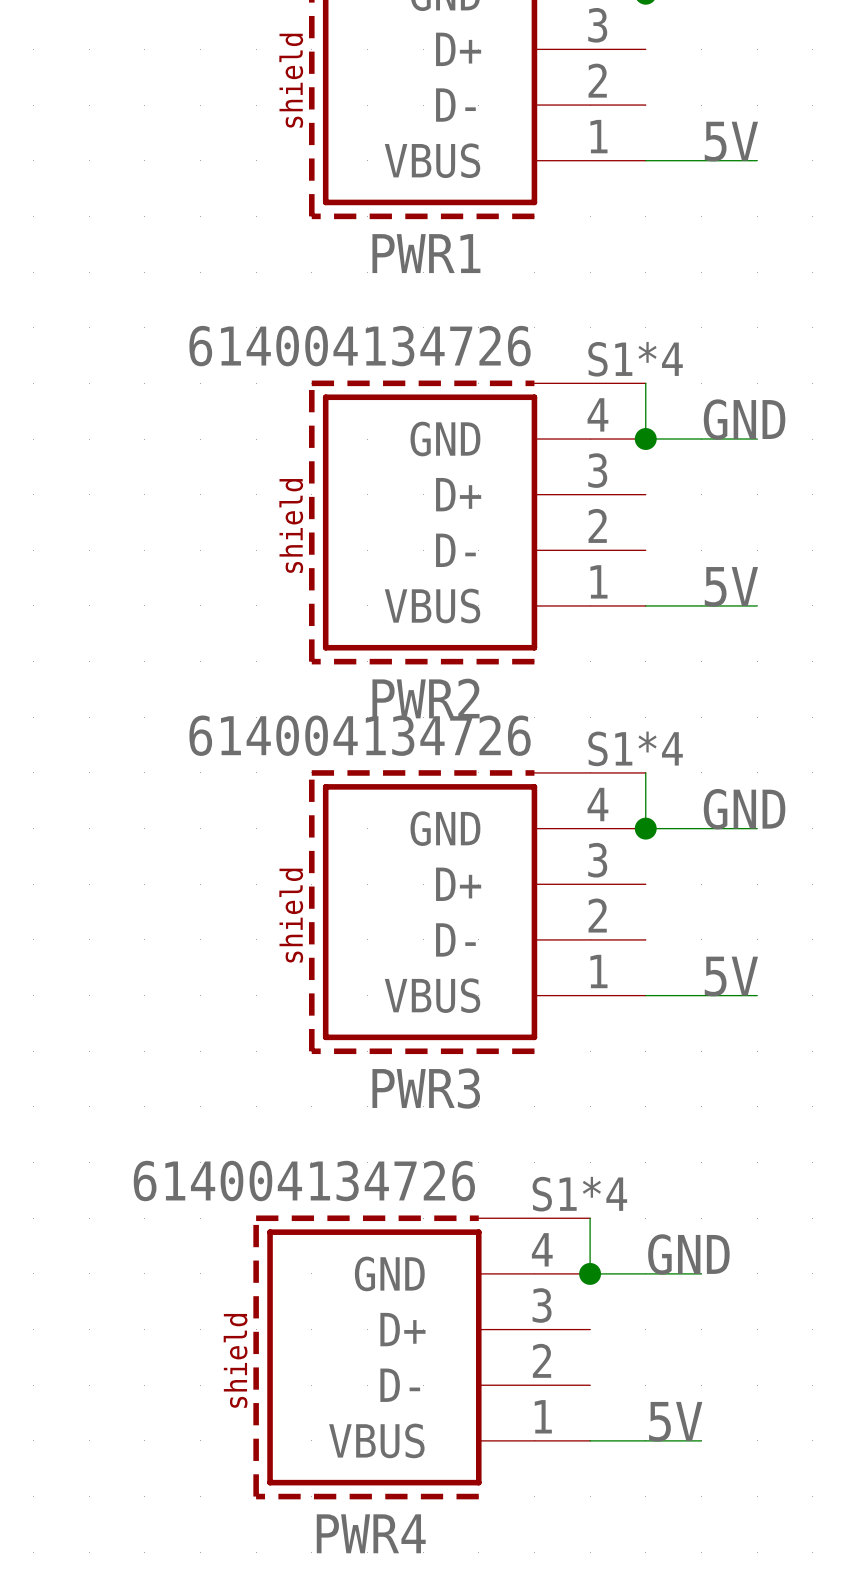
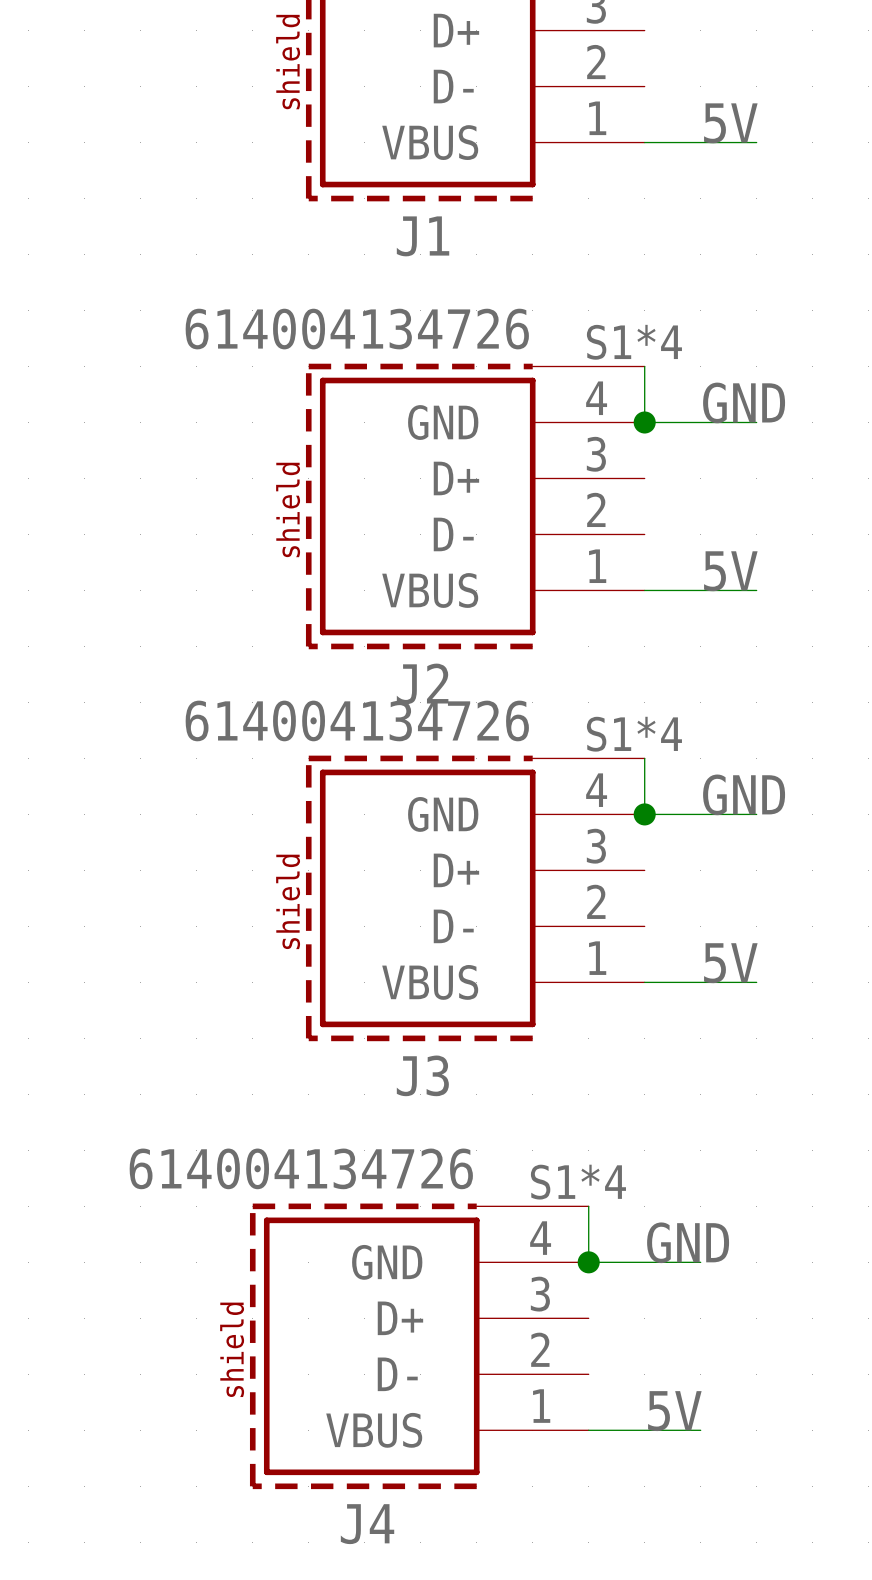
PWR1 name: PWR1 (426, 253) -> J1 (423, 236)
PWR2 name: PWR2 (426, 698) -> J2 (422, 683)
PWR3 name: PWR3 (426, 1088) -> J3 (422, 1075)
PWR4 name: PWR4 (371, 1533) -> J4 (367, 1524)

